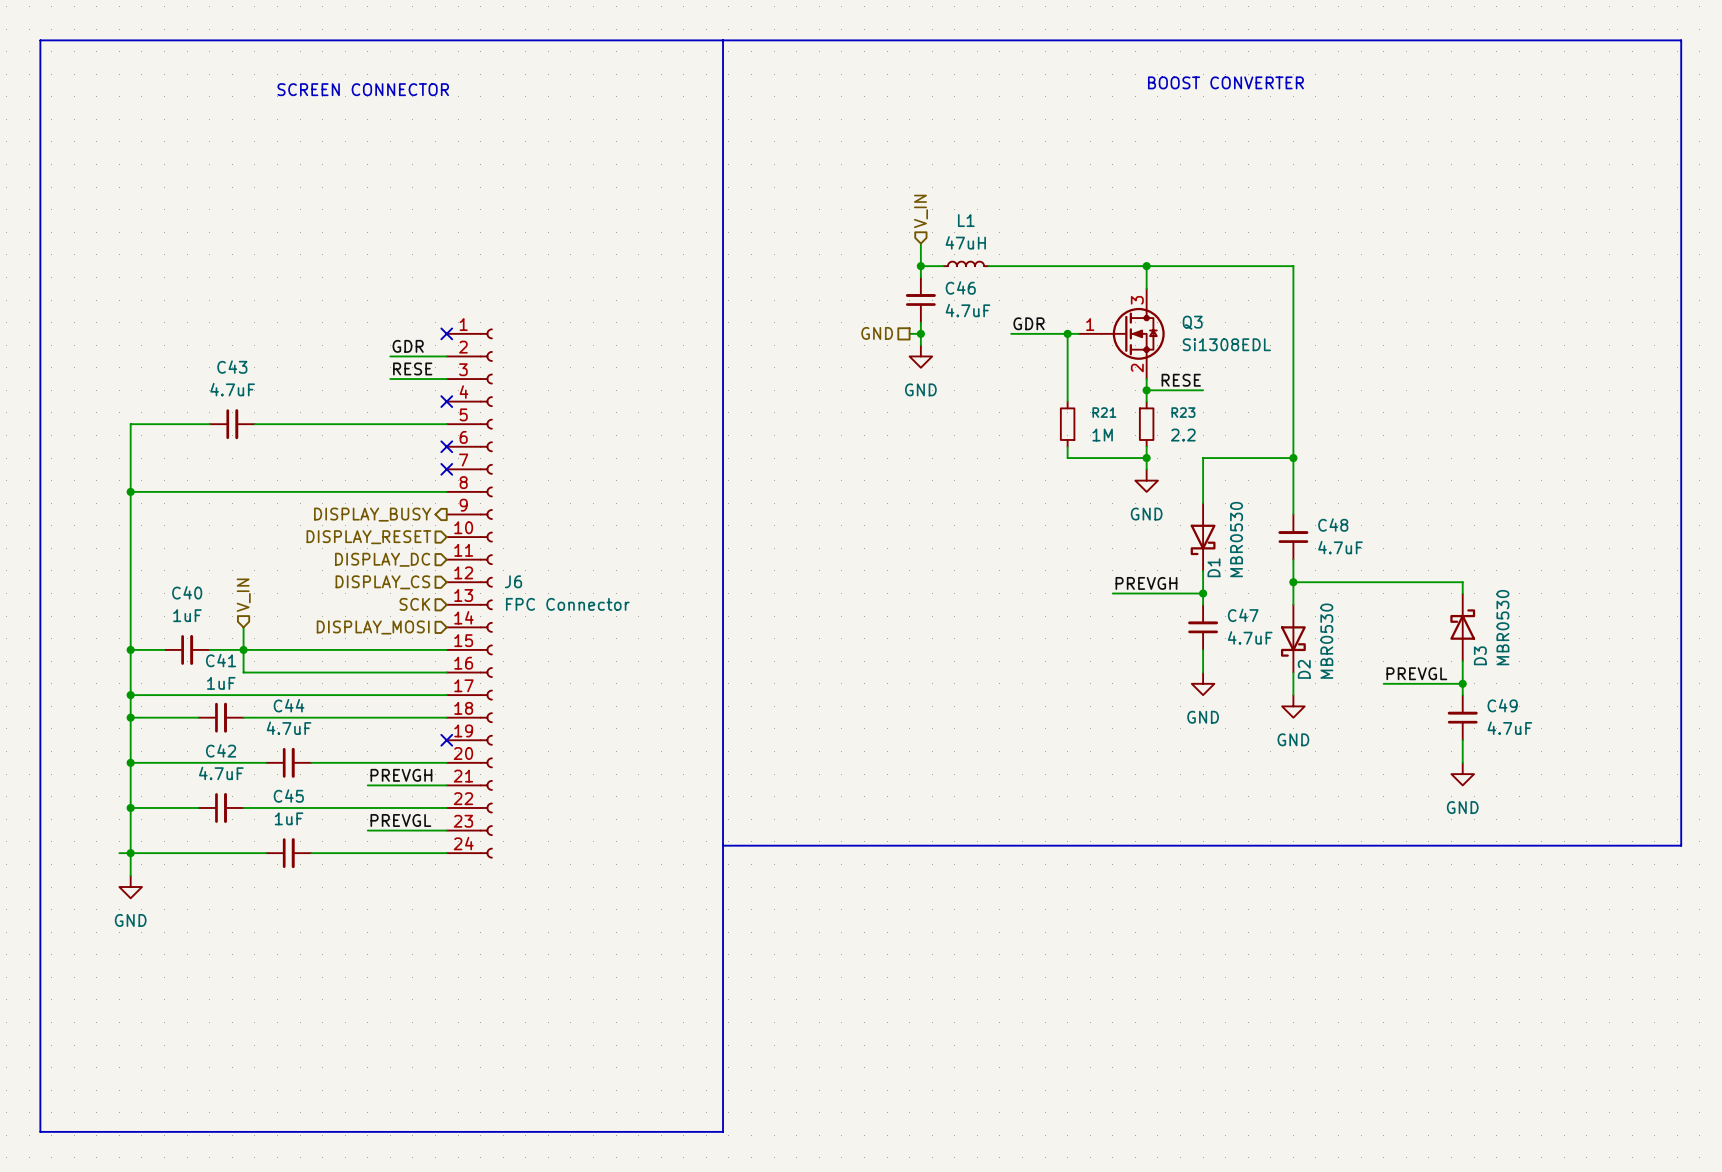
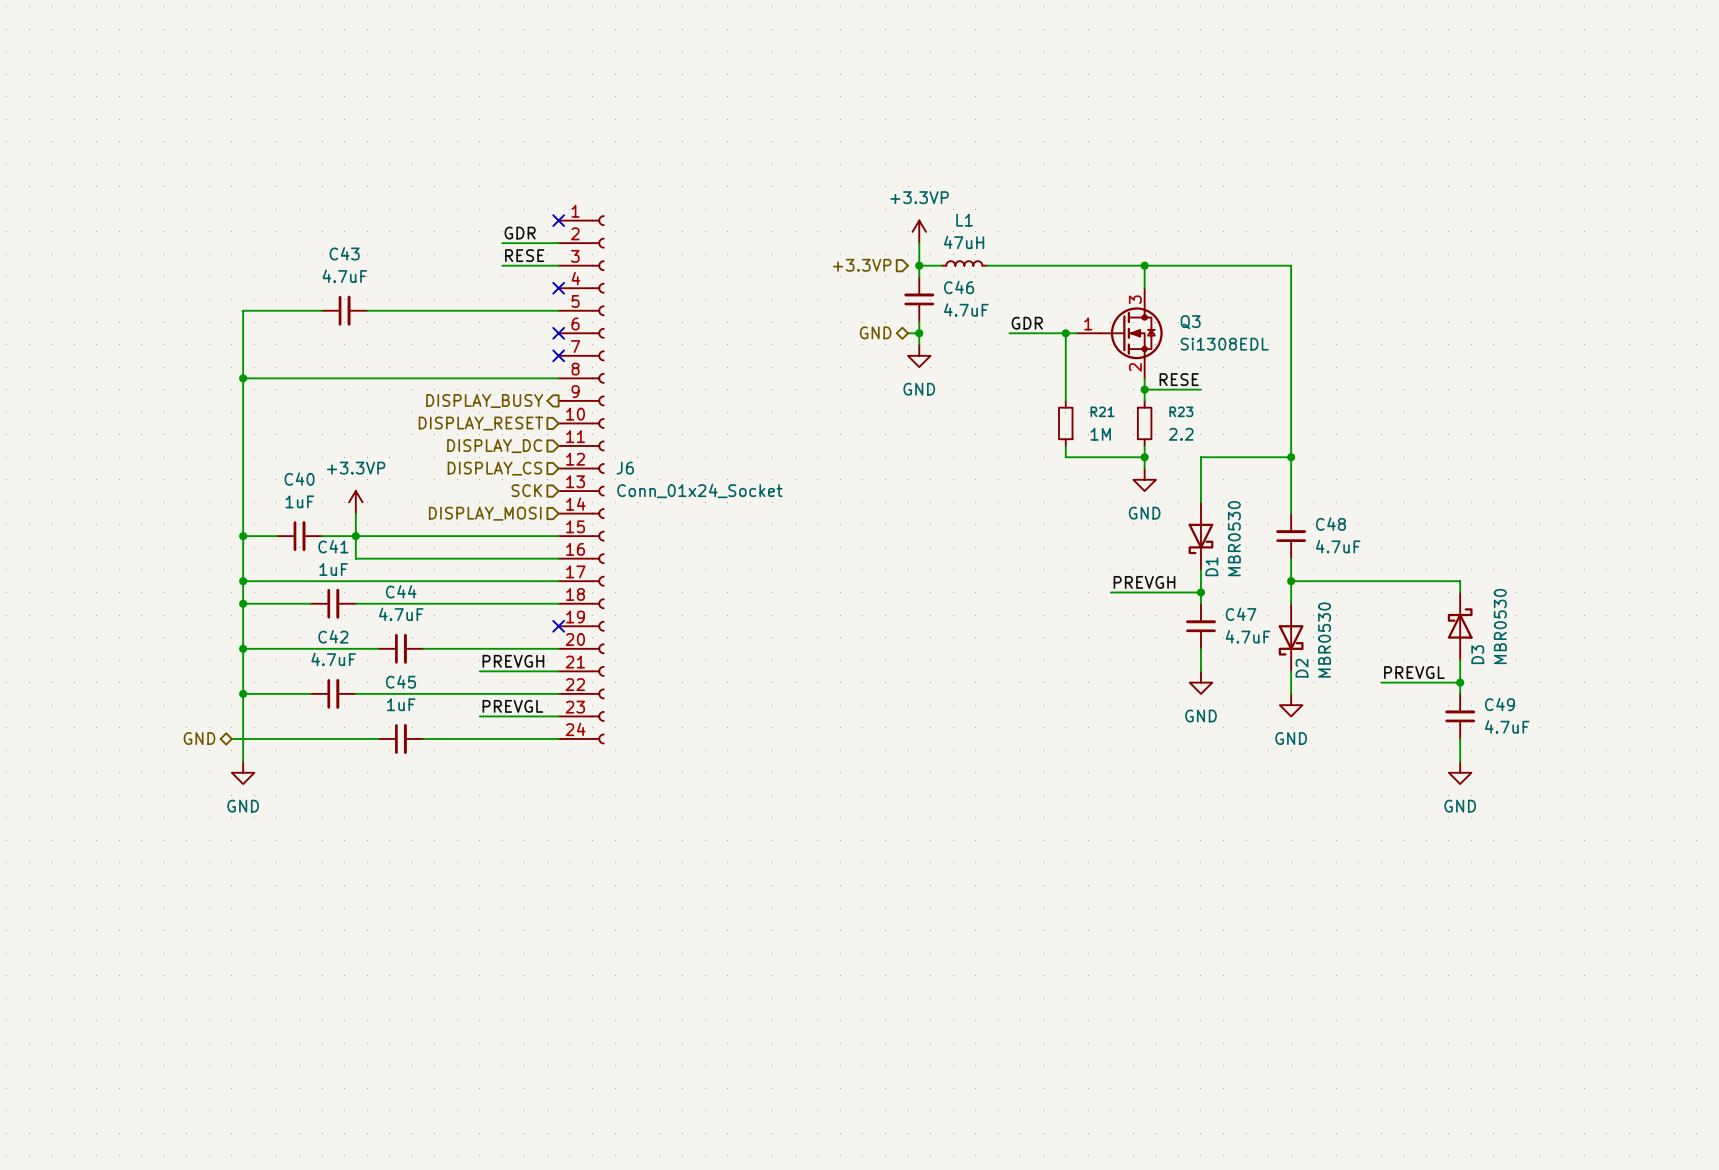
line: (723, 40) (723, 1131) (40, 1131) (40, 40) (1681, 40) (1681, 845) (723, 845) -> none
text: BOOST CONVERTER (1225, 82) -> none
text: SCREEN CONNECTOR (363, 89) -> none
hierarchical label: V_IN (920, 211) -> none
no-connect mark: none -> (558, 220)
power symbol: none -> +3.3VP (919, 231)
hierarchical label: none -> +3.3VP (862, 265)
wire: none -> (502, 265) (558, 265)
no-connect mark: none -> (558, 288)
wire: none -> (322, 310) (243, 310) (243, 626)
no-connect mark: (446, 333) -> none
no-connect mark: none -> (558, 333)
hierarchical label shape: passive (877, 333) -> bidirectional (875, 332)
label position: GDR (408, 346) -> GDR (520, 233)
wire: (390, 356) (446, 356) -> (502, 243) (558, 243)
no-connect mark: none -> (558, 355)
label position: RESE (412, 368) -> RESE (524, 255)
wire: none -> (243, 378) (389, 378)
junction: none -> (243, 378)
wire: none -> (445, 378) (558, 378)
no-connect mark: (446, 401) -> none
wire: (209, 424) (130, 424) (130, 875) -> none
C43 position: (232, 424) -> (344, 310)
wire: (254, 424) (446, 424) -> (367, 310) (558, 310)
no-connect mark: (446, 446) -> none
no-connect mark: (446, 469) -> none
wire: (130, 491) (446, 491) -> (243, 581) (558, 581)
junction: (130, 491) -> none
power symbol: none -> +3.3VP (355, 502)
wire: none -> (355, 513) (355, 558) (558, 558)
hierarchical label position: DISPLAY_BUSY (372, 514) -> DISPLAY_BUSY (484, 401)
junction: none -> (243, 536)
wire: none -> (322, 536) (558, 536)
junction: none -> (355, 536)
hierarchical label position: DISPLAY_RESET (368, 537) -> DISPLAY_RESET (480, 423)
hierarchical label position: DISPLAY_DC (382, 559) -> DISPLAY_DC (494, 446)
junction: none -> (243, 581)
hierarchical label position: DISPLAY_CS (382, 582) -> DISPLAY_CS (494, 468)
J6 position: (469, 593) -> (581, 479)
hierarchical label: V_IN (243, 595) -> none
junction: none -> (243, 603)
hierarchical label position: SCK (414, 604) -> SCK (526, 490)
J6 value: FPC Connector (567, 604) -> Conn_01x24_Socket (699, 490)
hierarchical label position: DISPLAY_MOSI (373, 627) -> DISPLAY_MOSI (485, 513)
no-connect mark: none -> (558, 626)
wire: (130, 649) (164, 649) -> (243, 536) (276, 536)
junction: (130, 649) -> none
C40 position: (187, 649) -> (299, 536)
wire: (209, 649) (243, 649) -> none
wire: none -> (445, 648) (558, 648)
wire: (243, 672) (446, 672) -> (243, 671) (243, 761)
wire: (130, 695) (243, 695) -> none
junction: (130, 695) -> none
junction: none -> (243, 693)
wire: none -> (445, 693) (558, 693)
wire: (130, 717) (198, 717) -> (243, 603) (310, 603)
junction: (130, 717) -> none
C41 position: (220, 717) -> (333, 603)
wire: (243, 717) (446, 717) -> (355, 603) (558, 603)
hierarchical label: none -> GND (199, 738)
no-connect mark: (446, 740) -> none
wire: (130, 762) (266, 762) -> none
junction: (130, 762) -> none
C44 position: (288, 762) -> (400, 648)
wire: (311, 762) (446, 762) -> none
label position: PREVGH (401, 775) -> PREVGH (513, 661)
wire: (367, 785) (446, 785) -> (479, 671) (558, 671)
wire: (130, 807) (198, 807) -> none
junction: (130, 807) -> none
C42 position: (220, 807) -> (333, 693)
wire: (243, 807) (446, 807) -> none
label position: PREVGL (400, 820) -> PREVGL (512, 706)
wire: (367, 830) (446, 830) -> (479, 716) (558, 716)
wire: (119, 853) (266, 853) -> (231, 738) (378, 738)
junction: (130, 853) -> none
C45 position: (288, 853) -> (400, 738)
wire: (311, 853) (446, 853) -> (423, 738) (558, 738)
power symbol position: GND (130, 887) -> GND (243, 772)

